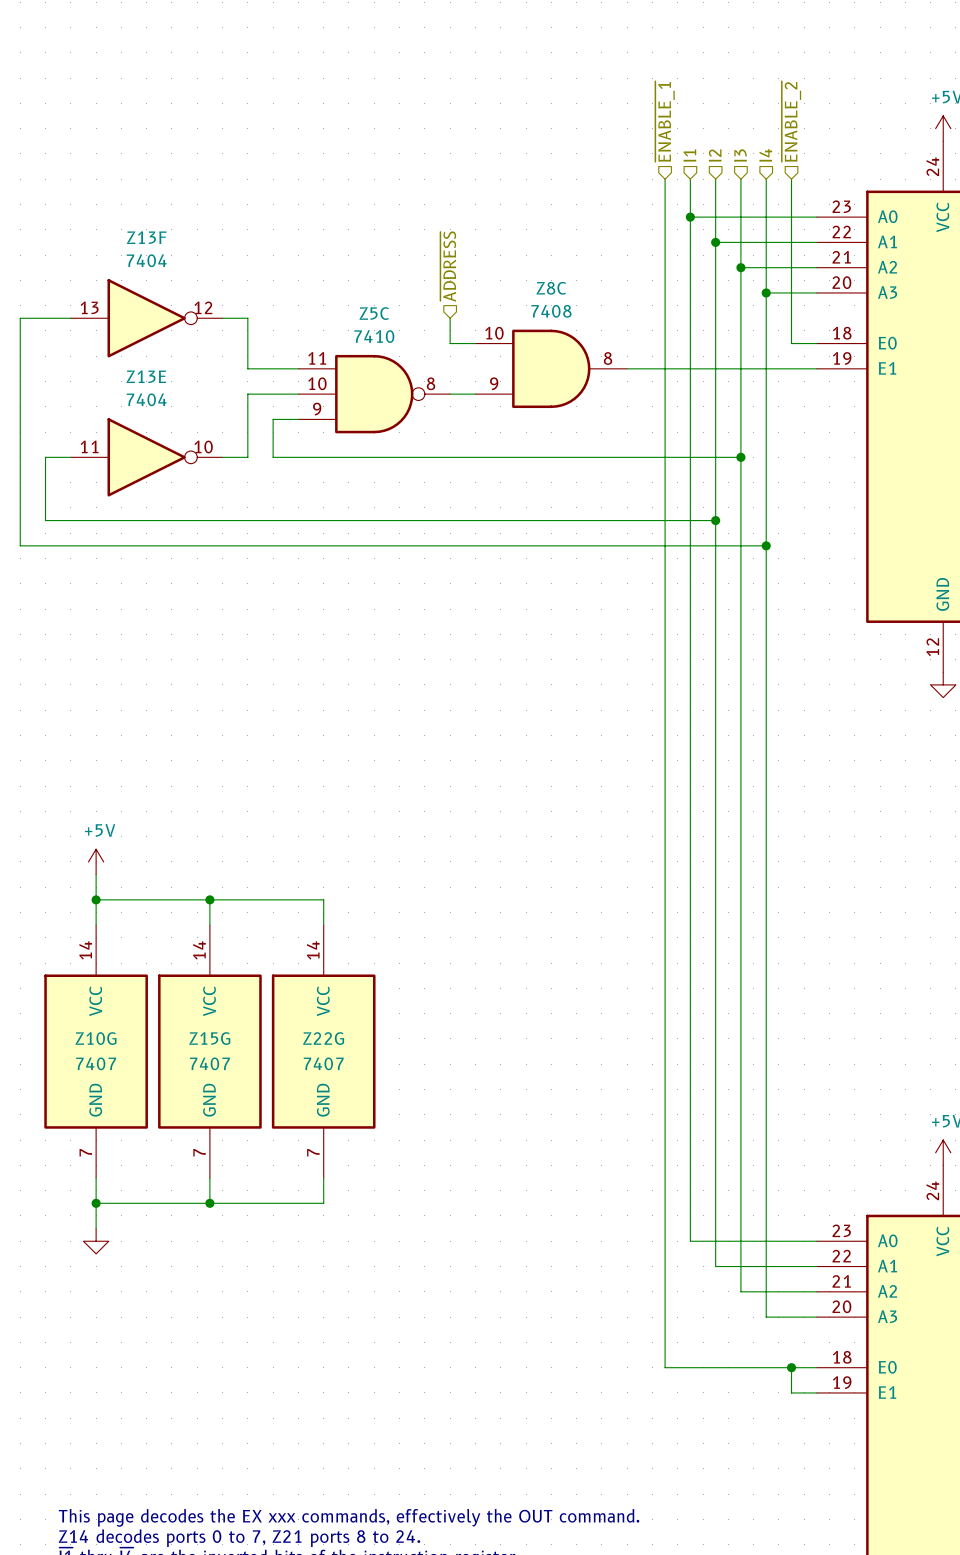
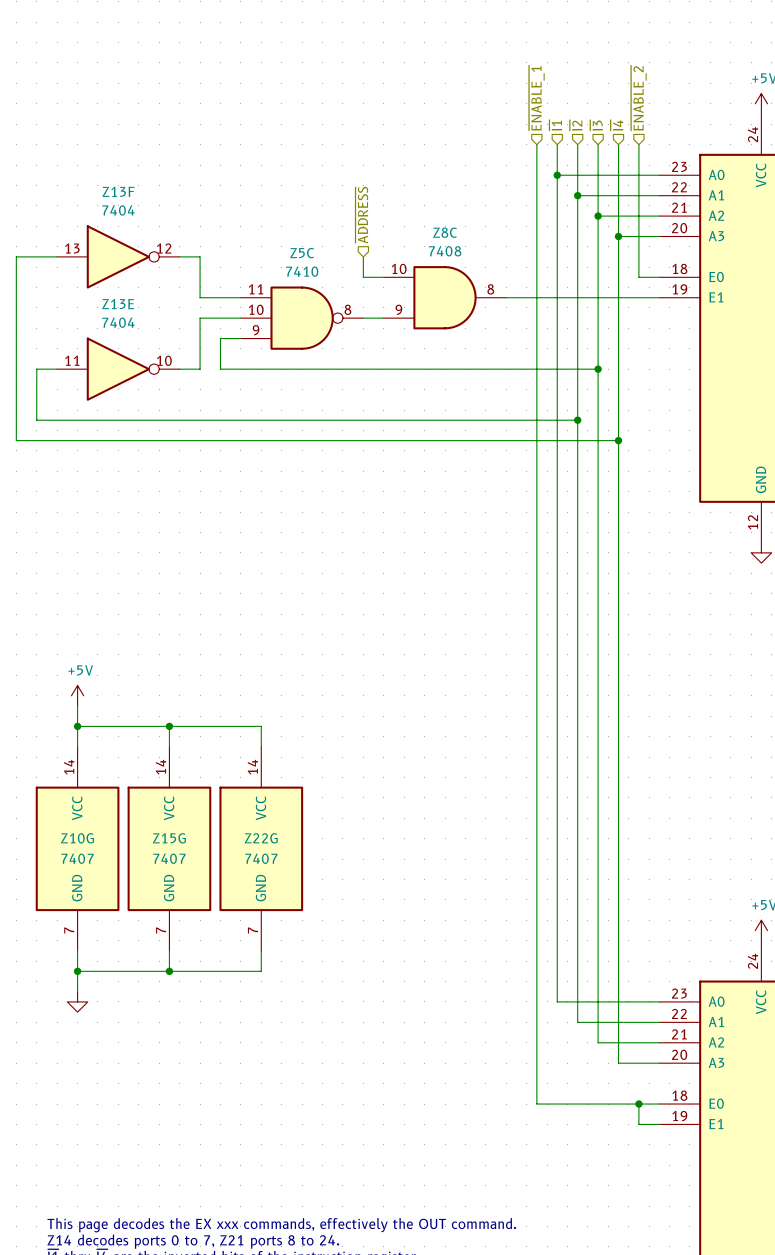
hierarchical label: I1 (689, 155) -> ~{I1} (555, 125)
hierarchical label: I2 (715, 155) -> ~{I2} (576, 125)
hierarchical label: I3 (740, 155) -> ~{I3} (596, 125)
hierarchical label: I4 (765, 155) -> ~{I4} (616, 125)

